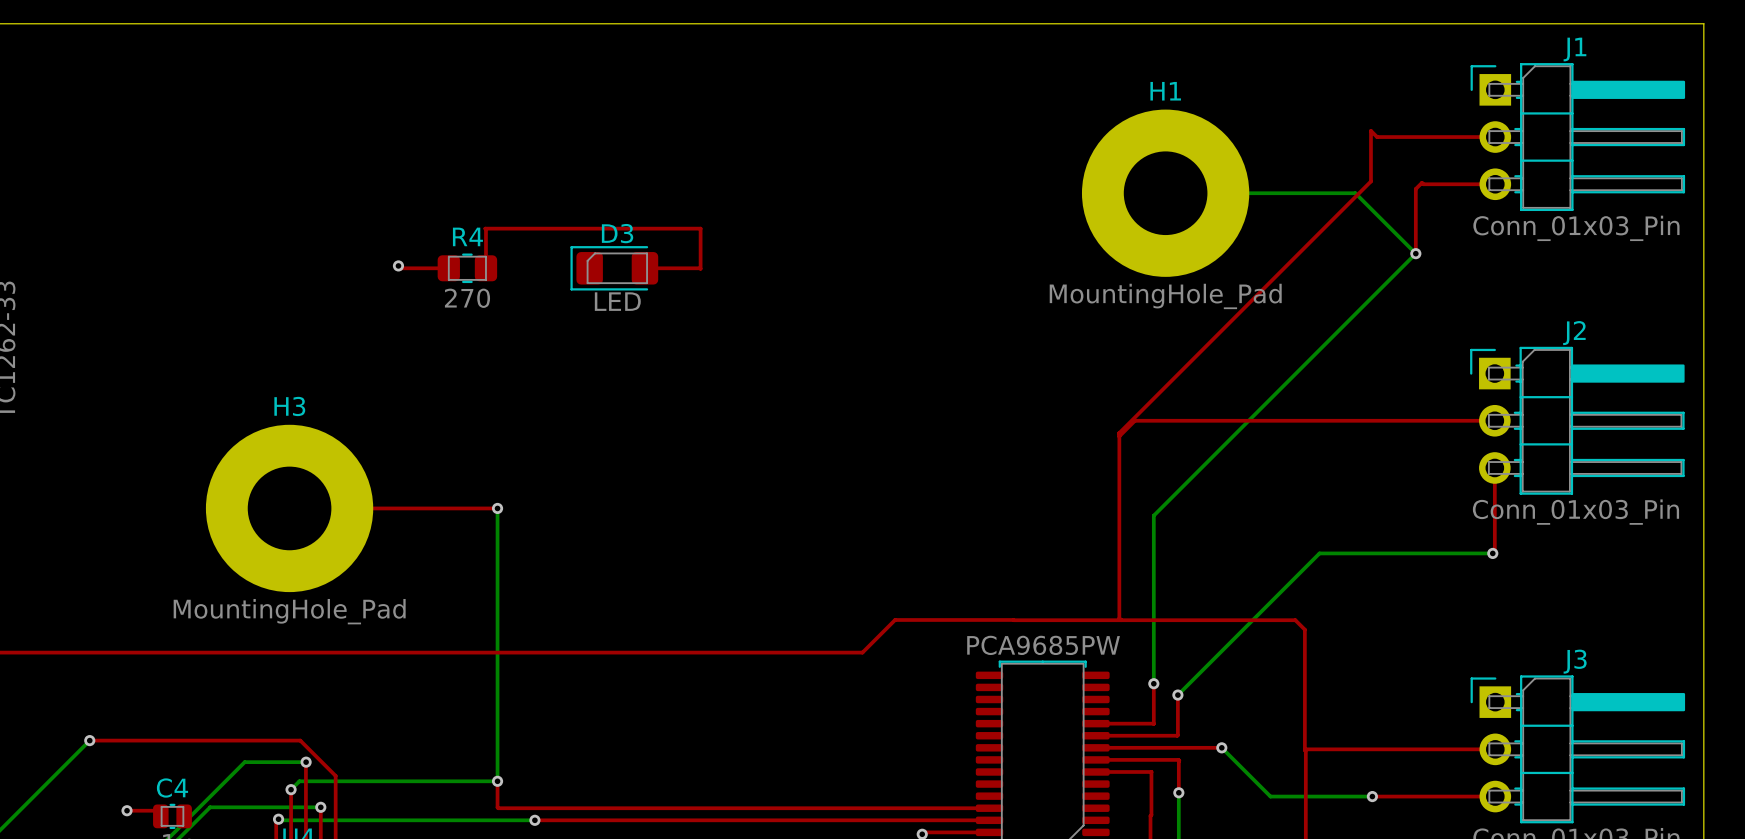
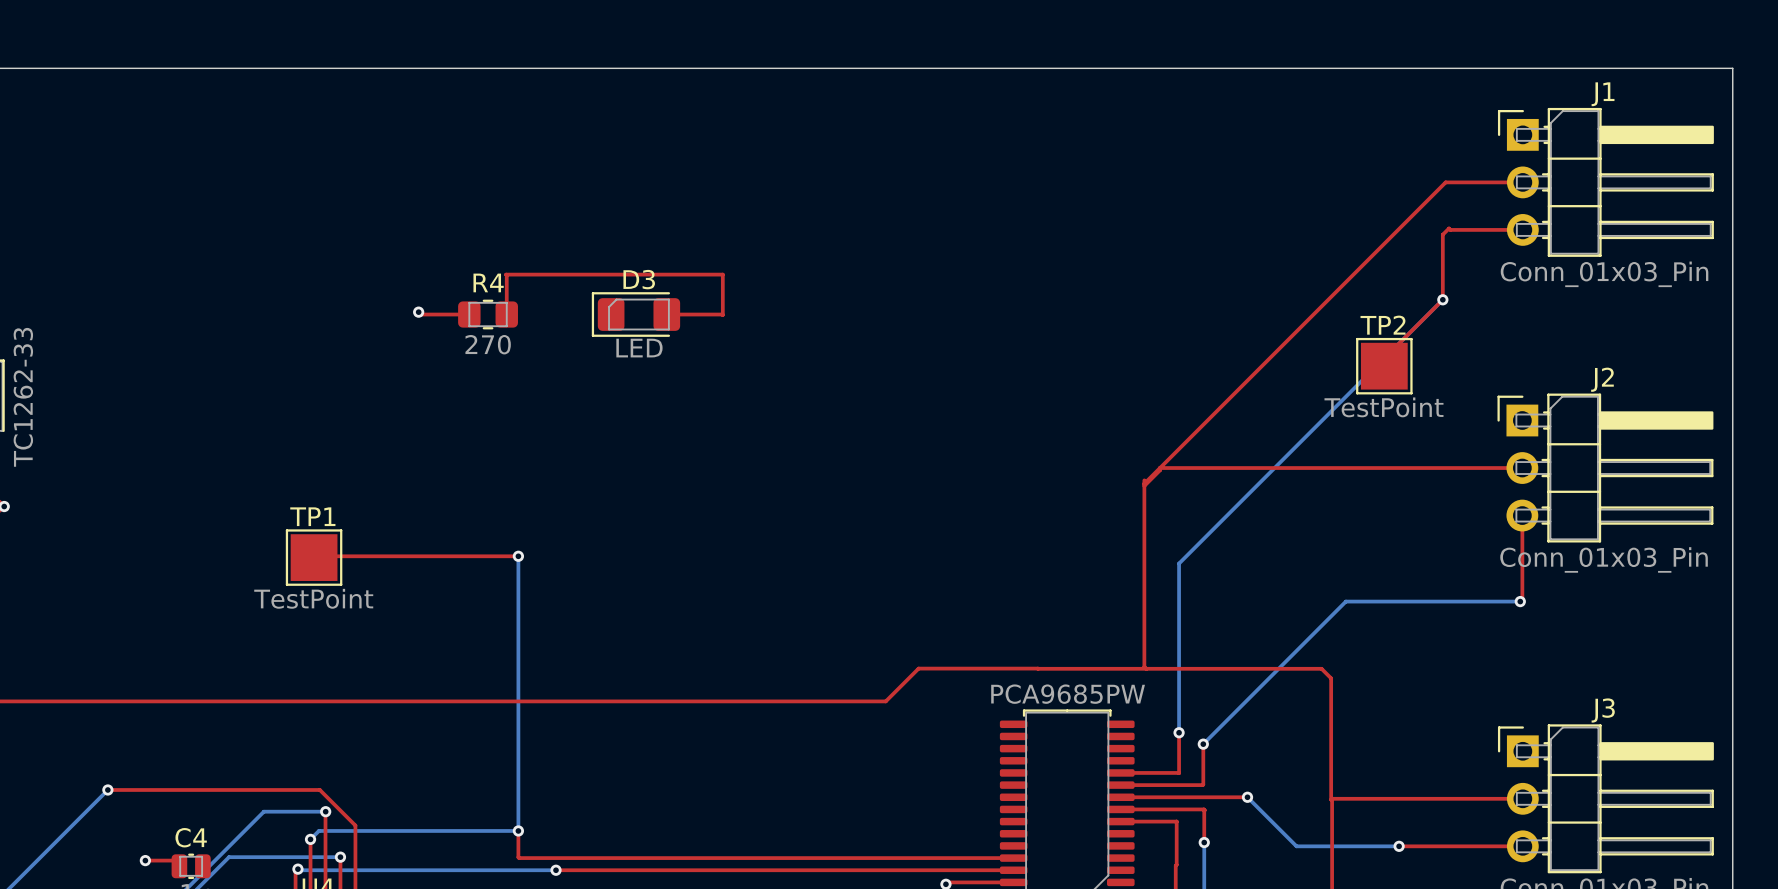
top track: (1418, 137) (1377, 137) (1370, 130) (1370, 181) (1118, 433) -> (1445, 182) (1144, 485)
bottom track: (1165, 193) (1355, 193) (1415, 253) -> none
H1: MountingHole_Pad (1165, 193) -> none
top track: none -> (1442, 299) (1384, 358) (1384, 366)
TP2: none -> TestPoint (1384, 366)
H3: MountingHole_Pad (289, 508) -> none
TP1: none -> TestPoint (314, 557)

